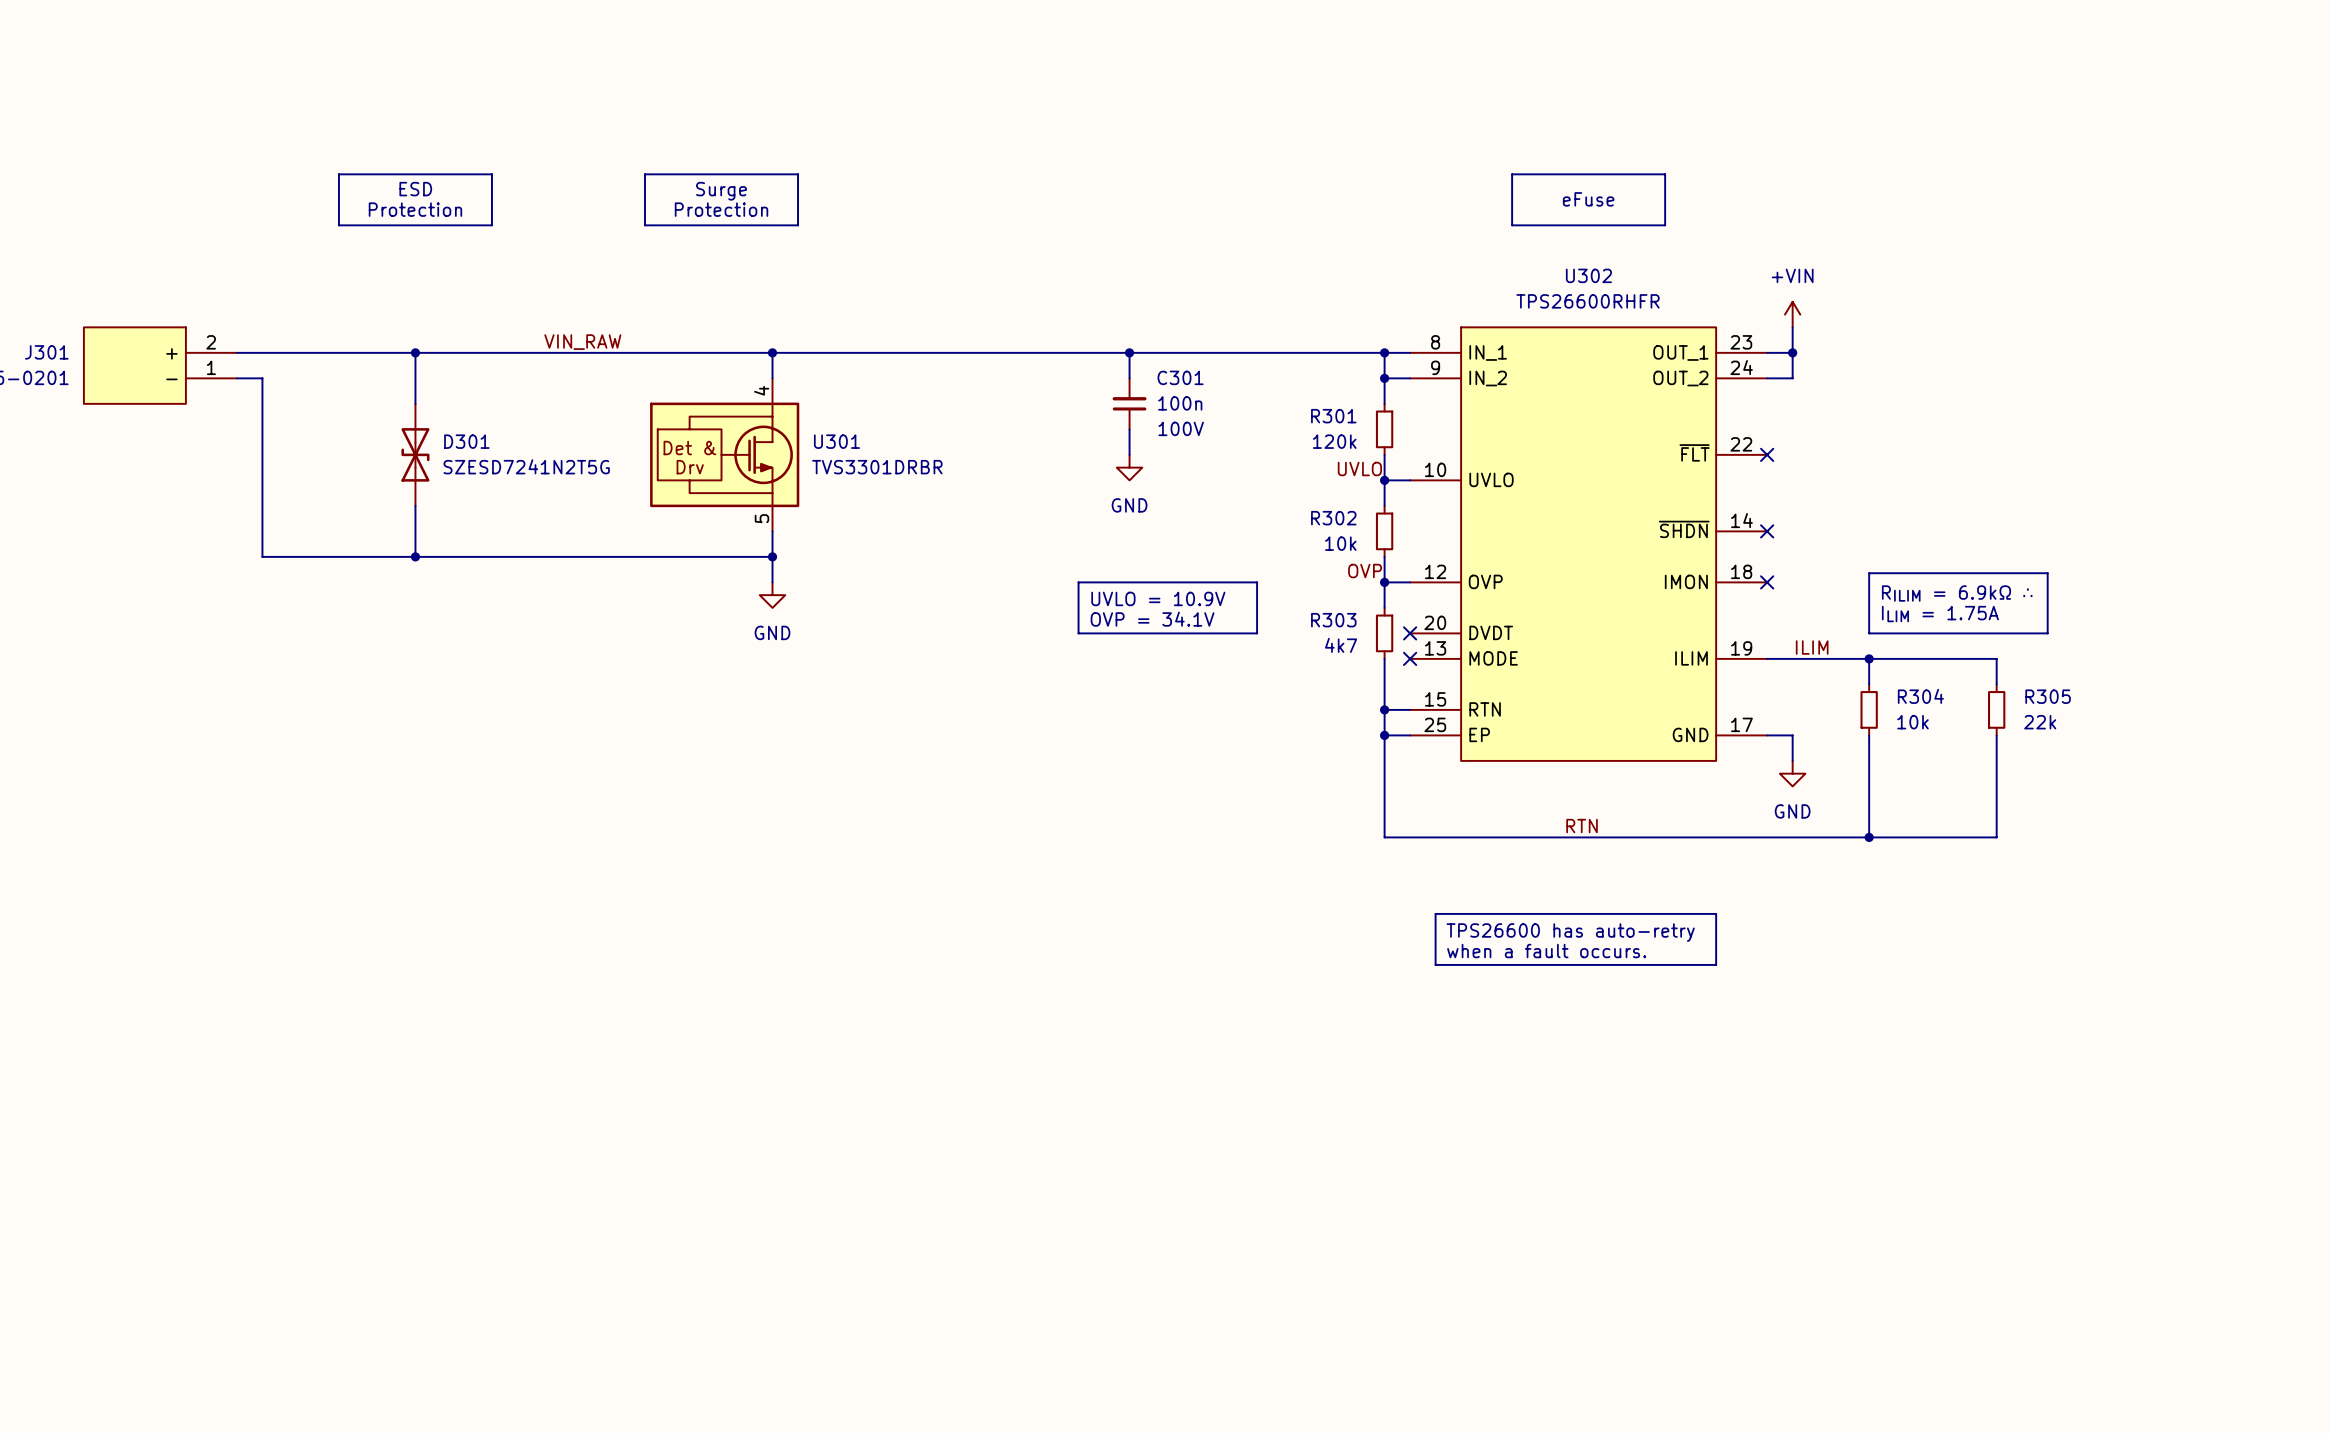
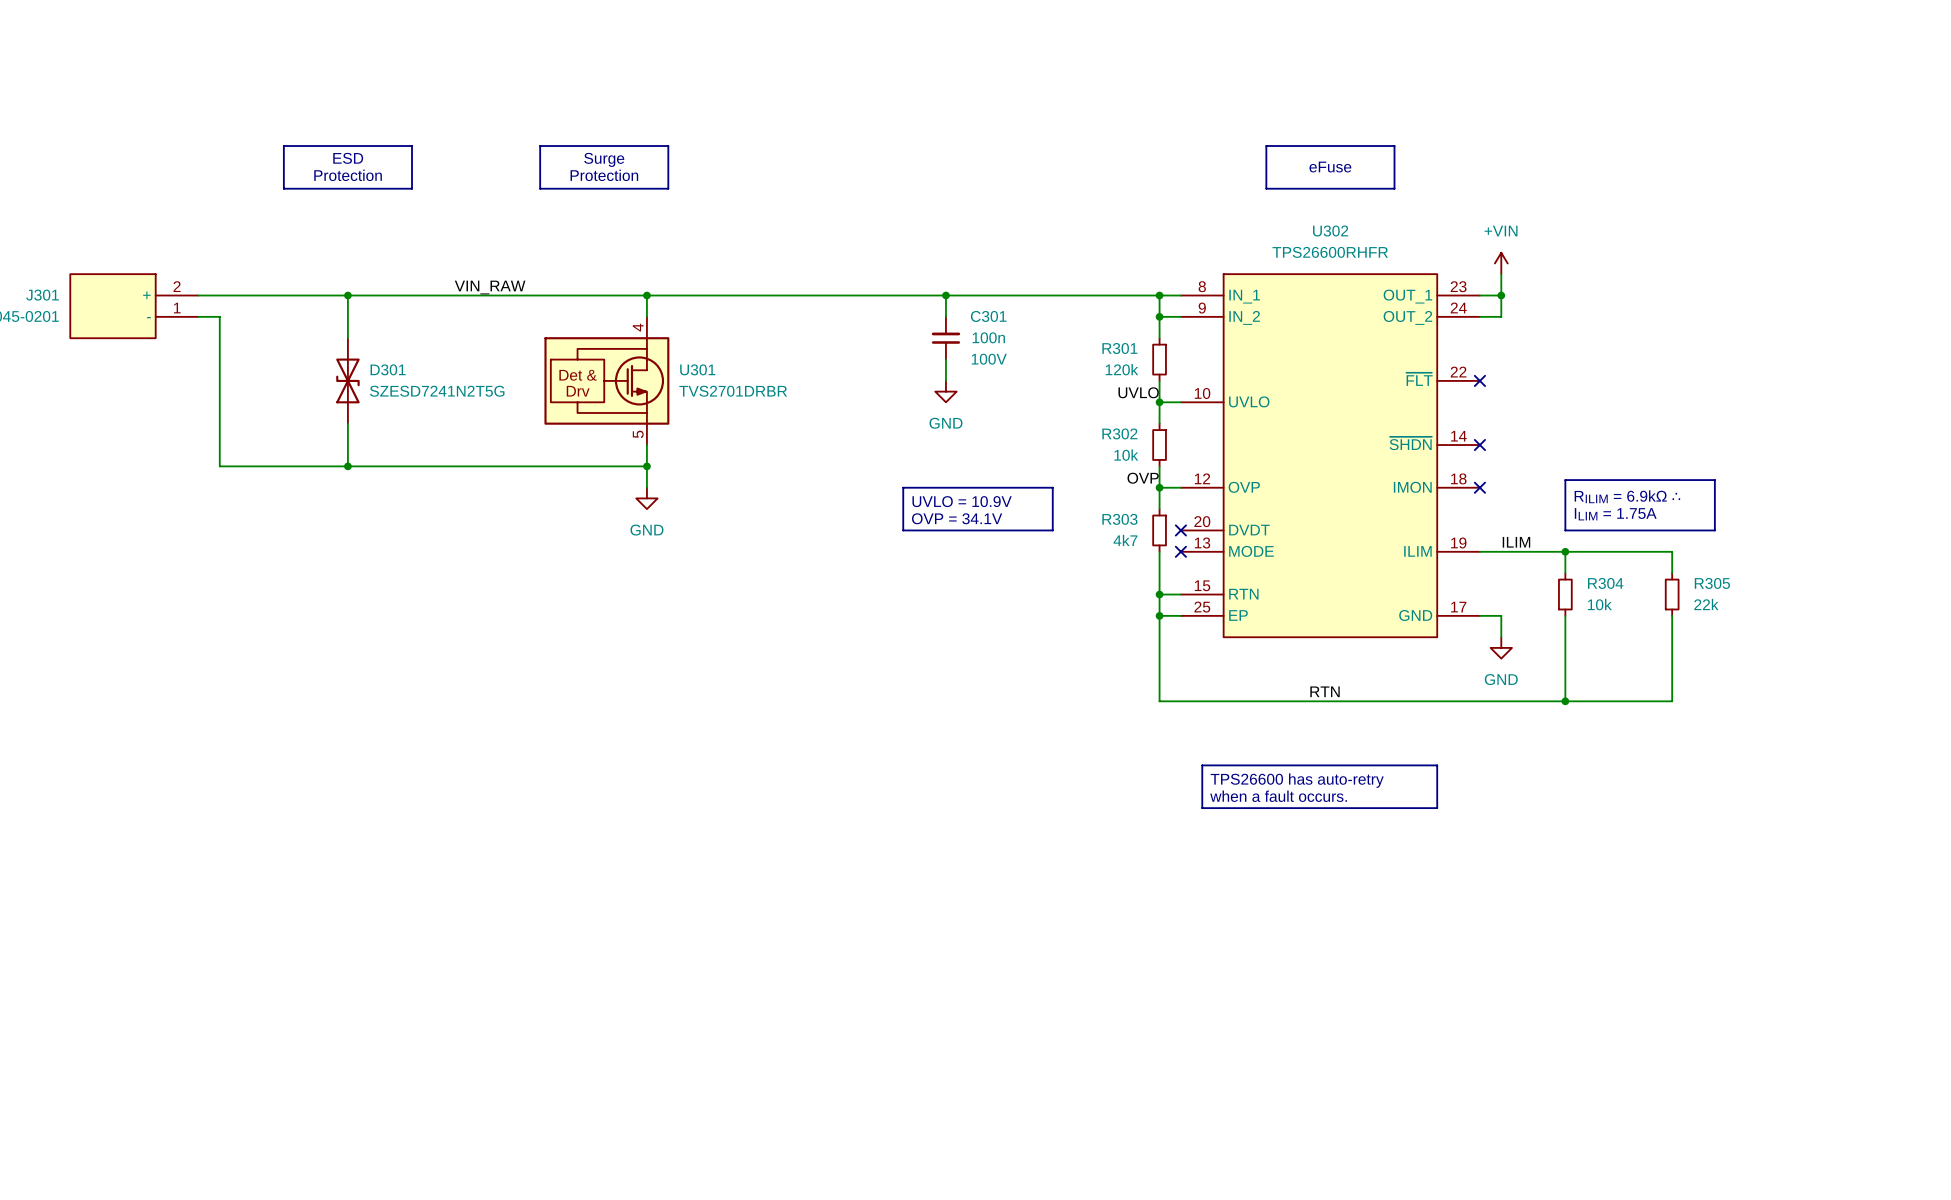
U301 value: TVS3301DRBR (877, 467) -> TVS2701DRBR (733, 391)

